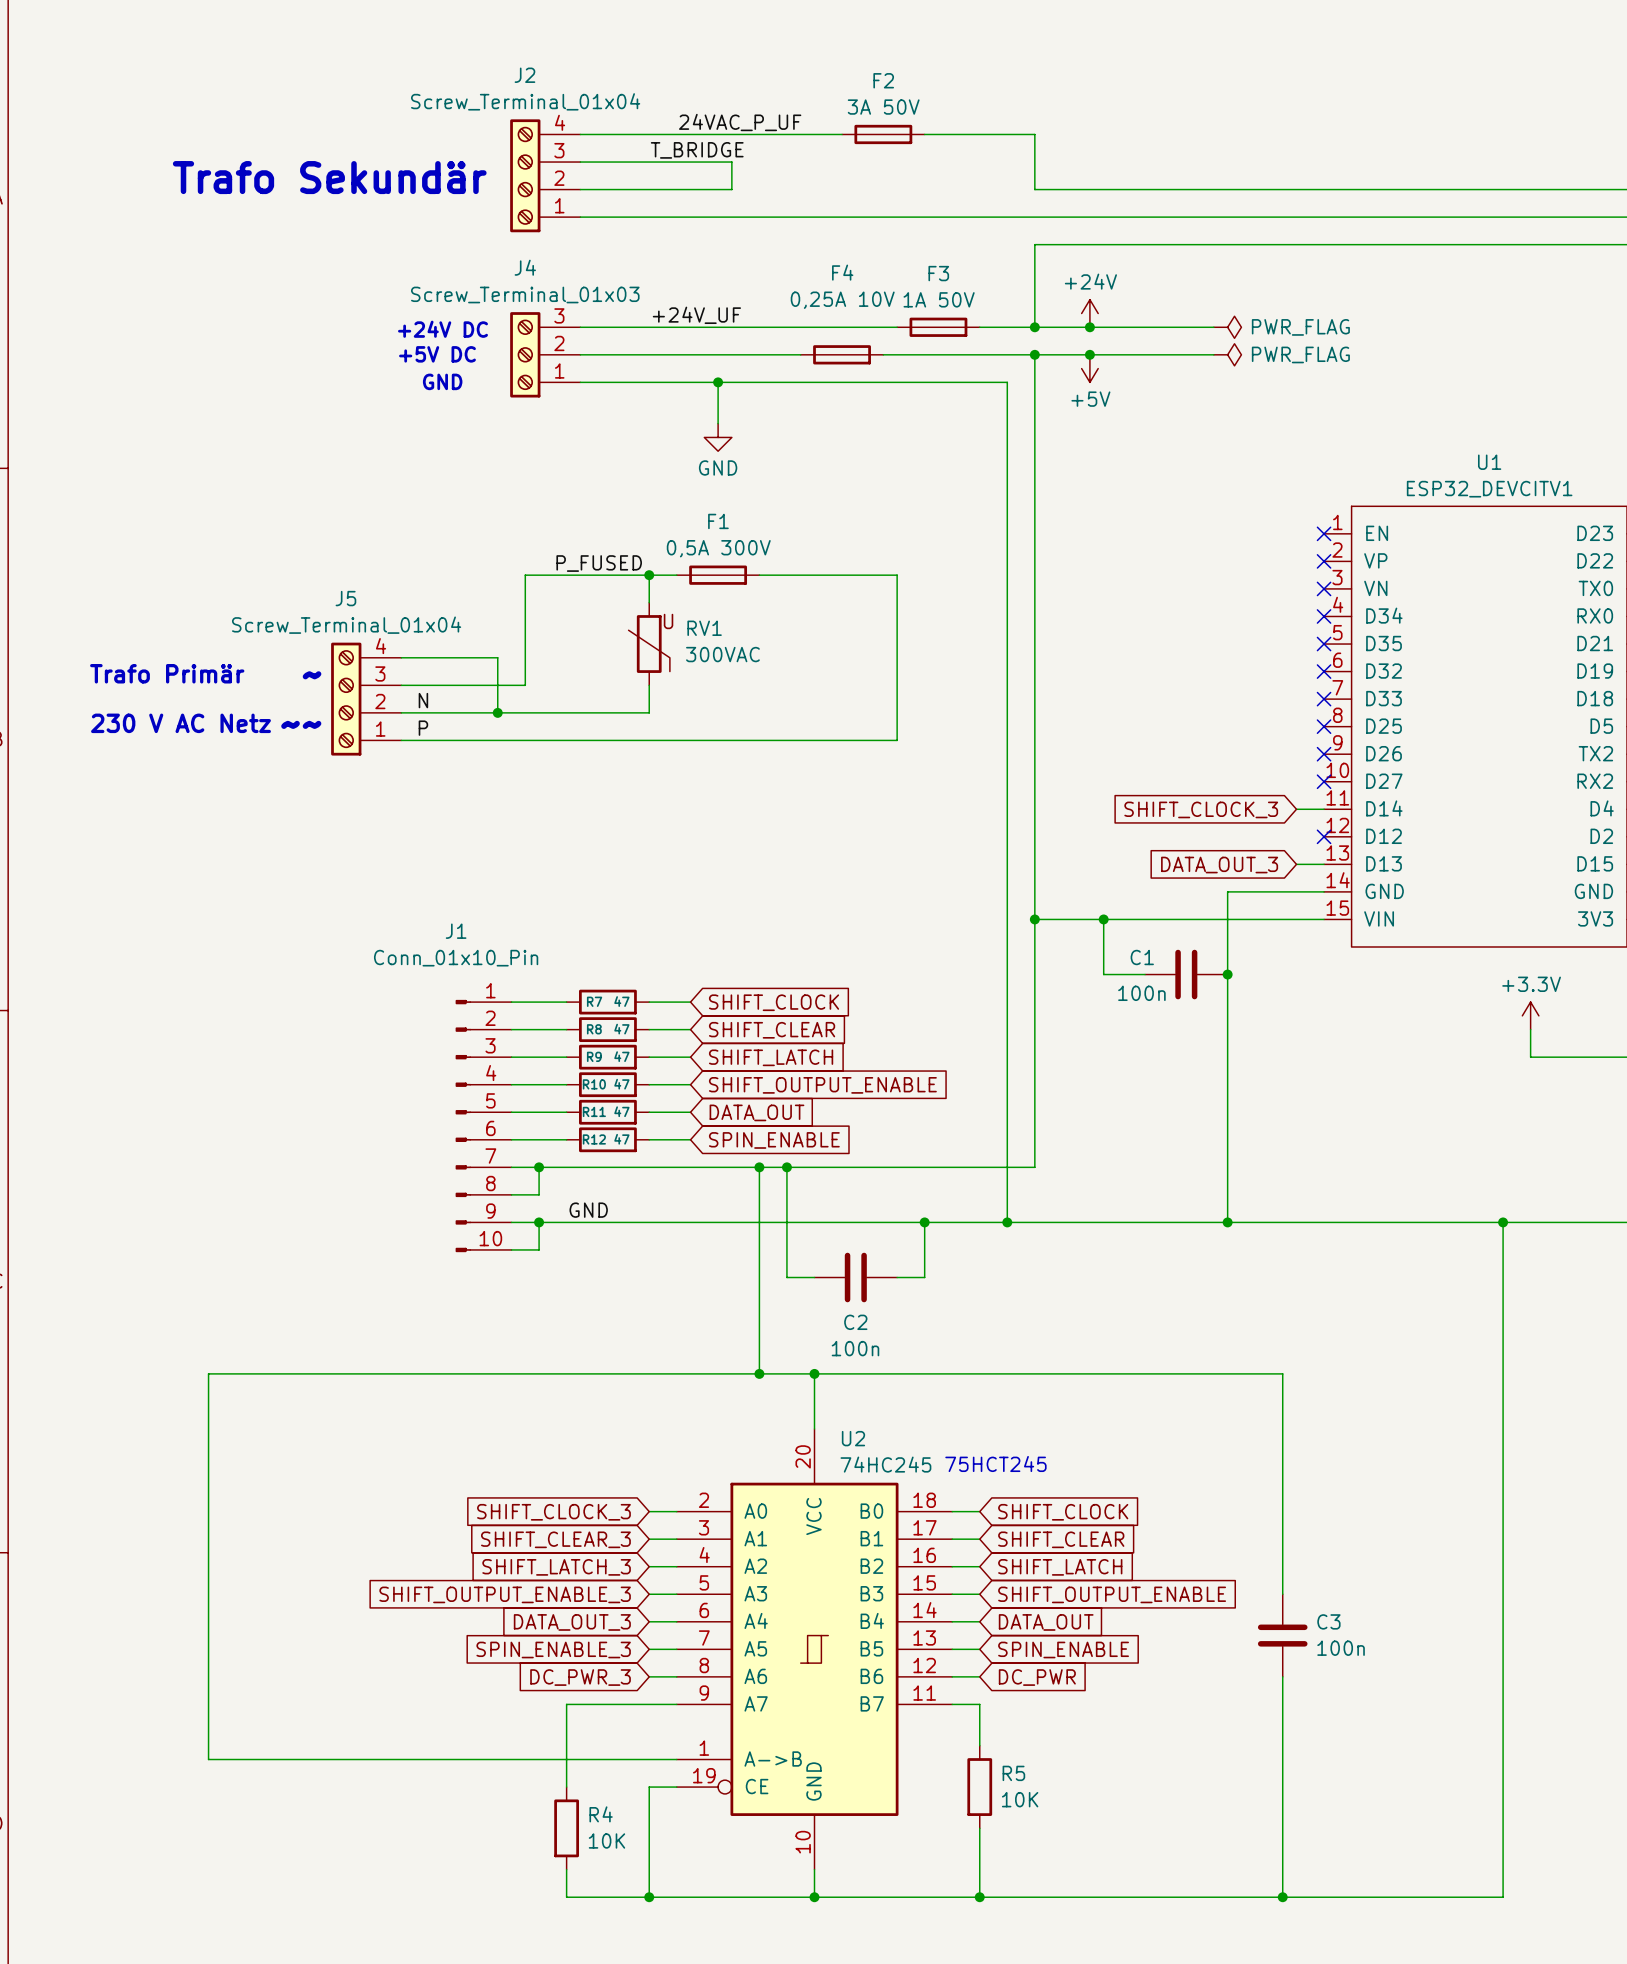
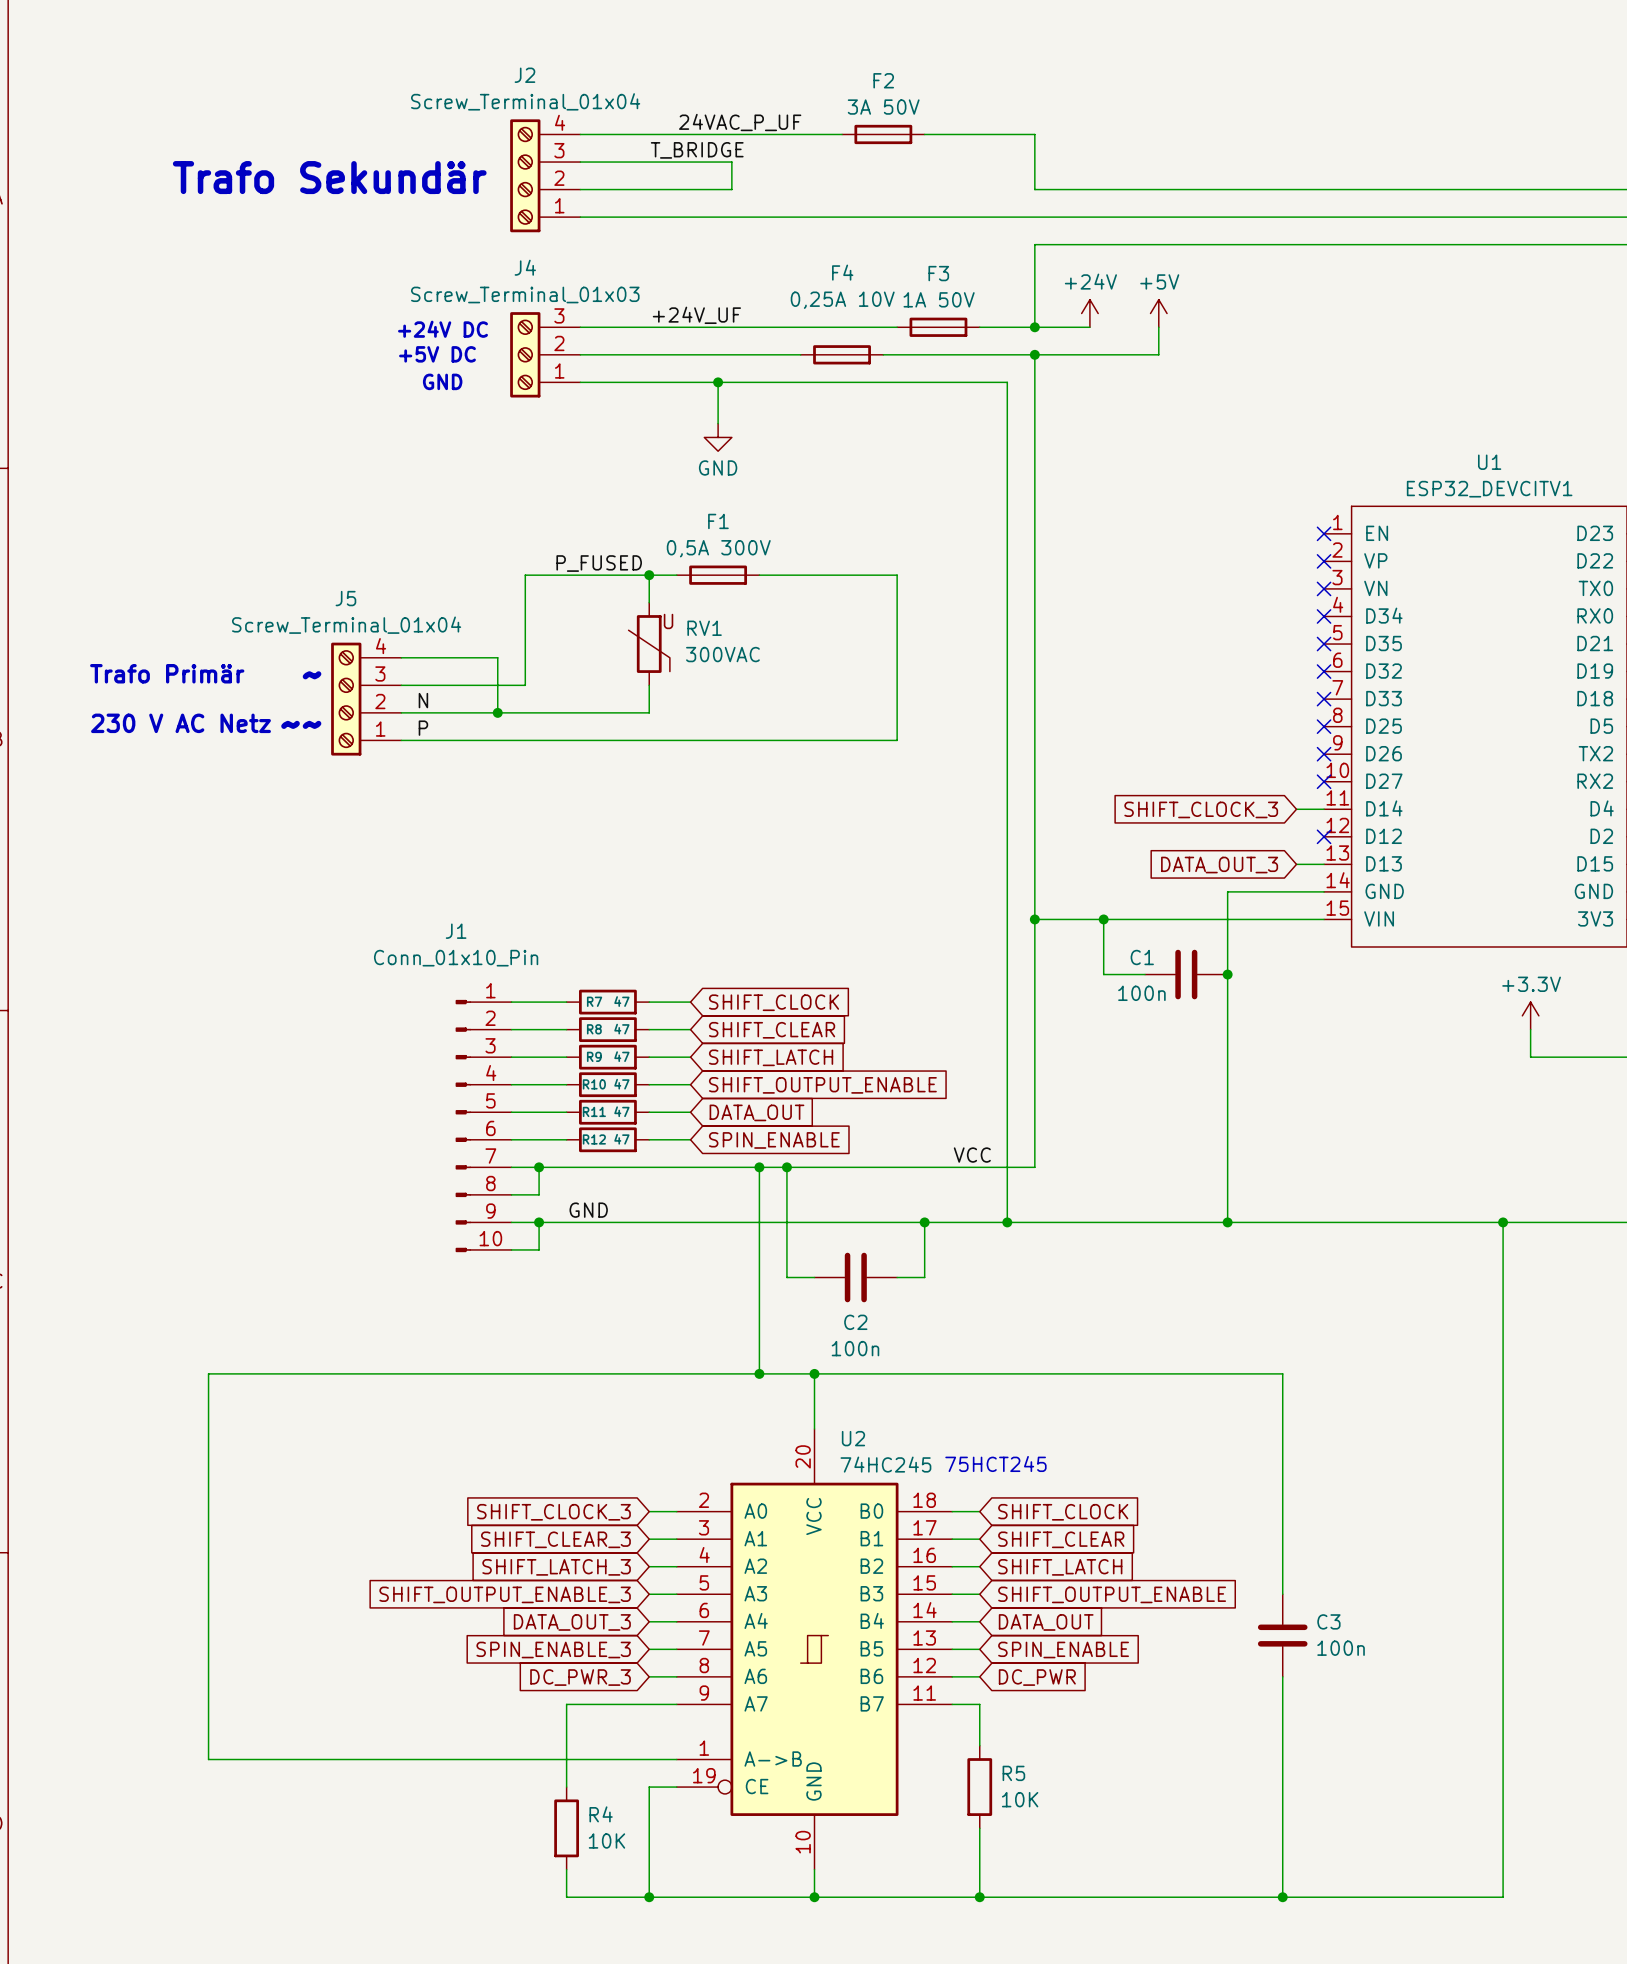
wire: (1089, 327) (1213, 327) -> none
junction: (1089, 327) -> none
power symbol: PWR_FLAG (1227, 327) -> none
junction: (1089, 354) -> none
wire: (1158, 354) (1213, 354) -> (1158, 354) (1158, 327)
power symbol: PWR_FLAG (1227, 354) -> none
power symbol rotation: 0° (1089, 368) -> 180° (1158, 313)
power symbol position: +5V (1089, 368) -> +5V (1158, 313)
label: none -> VCC (972, 1155)

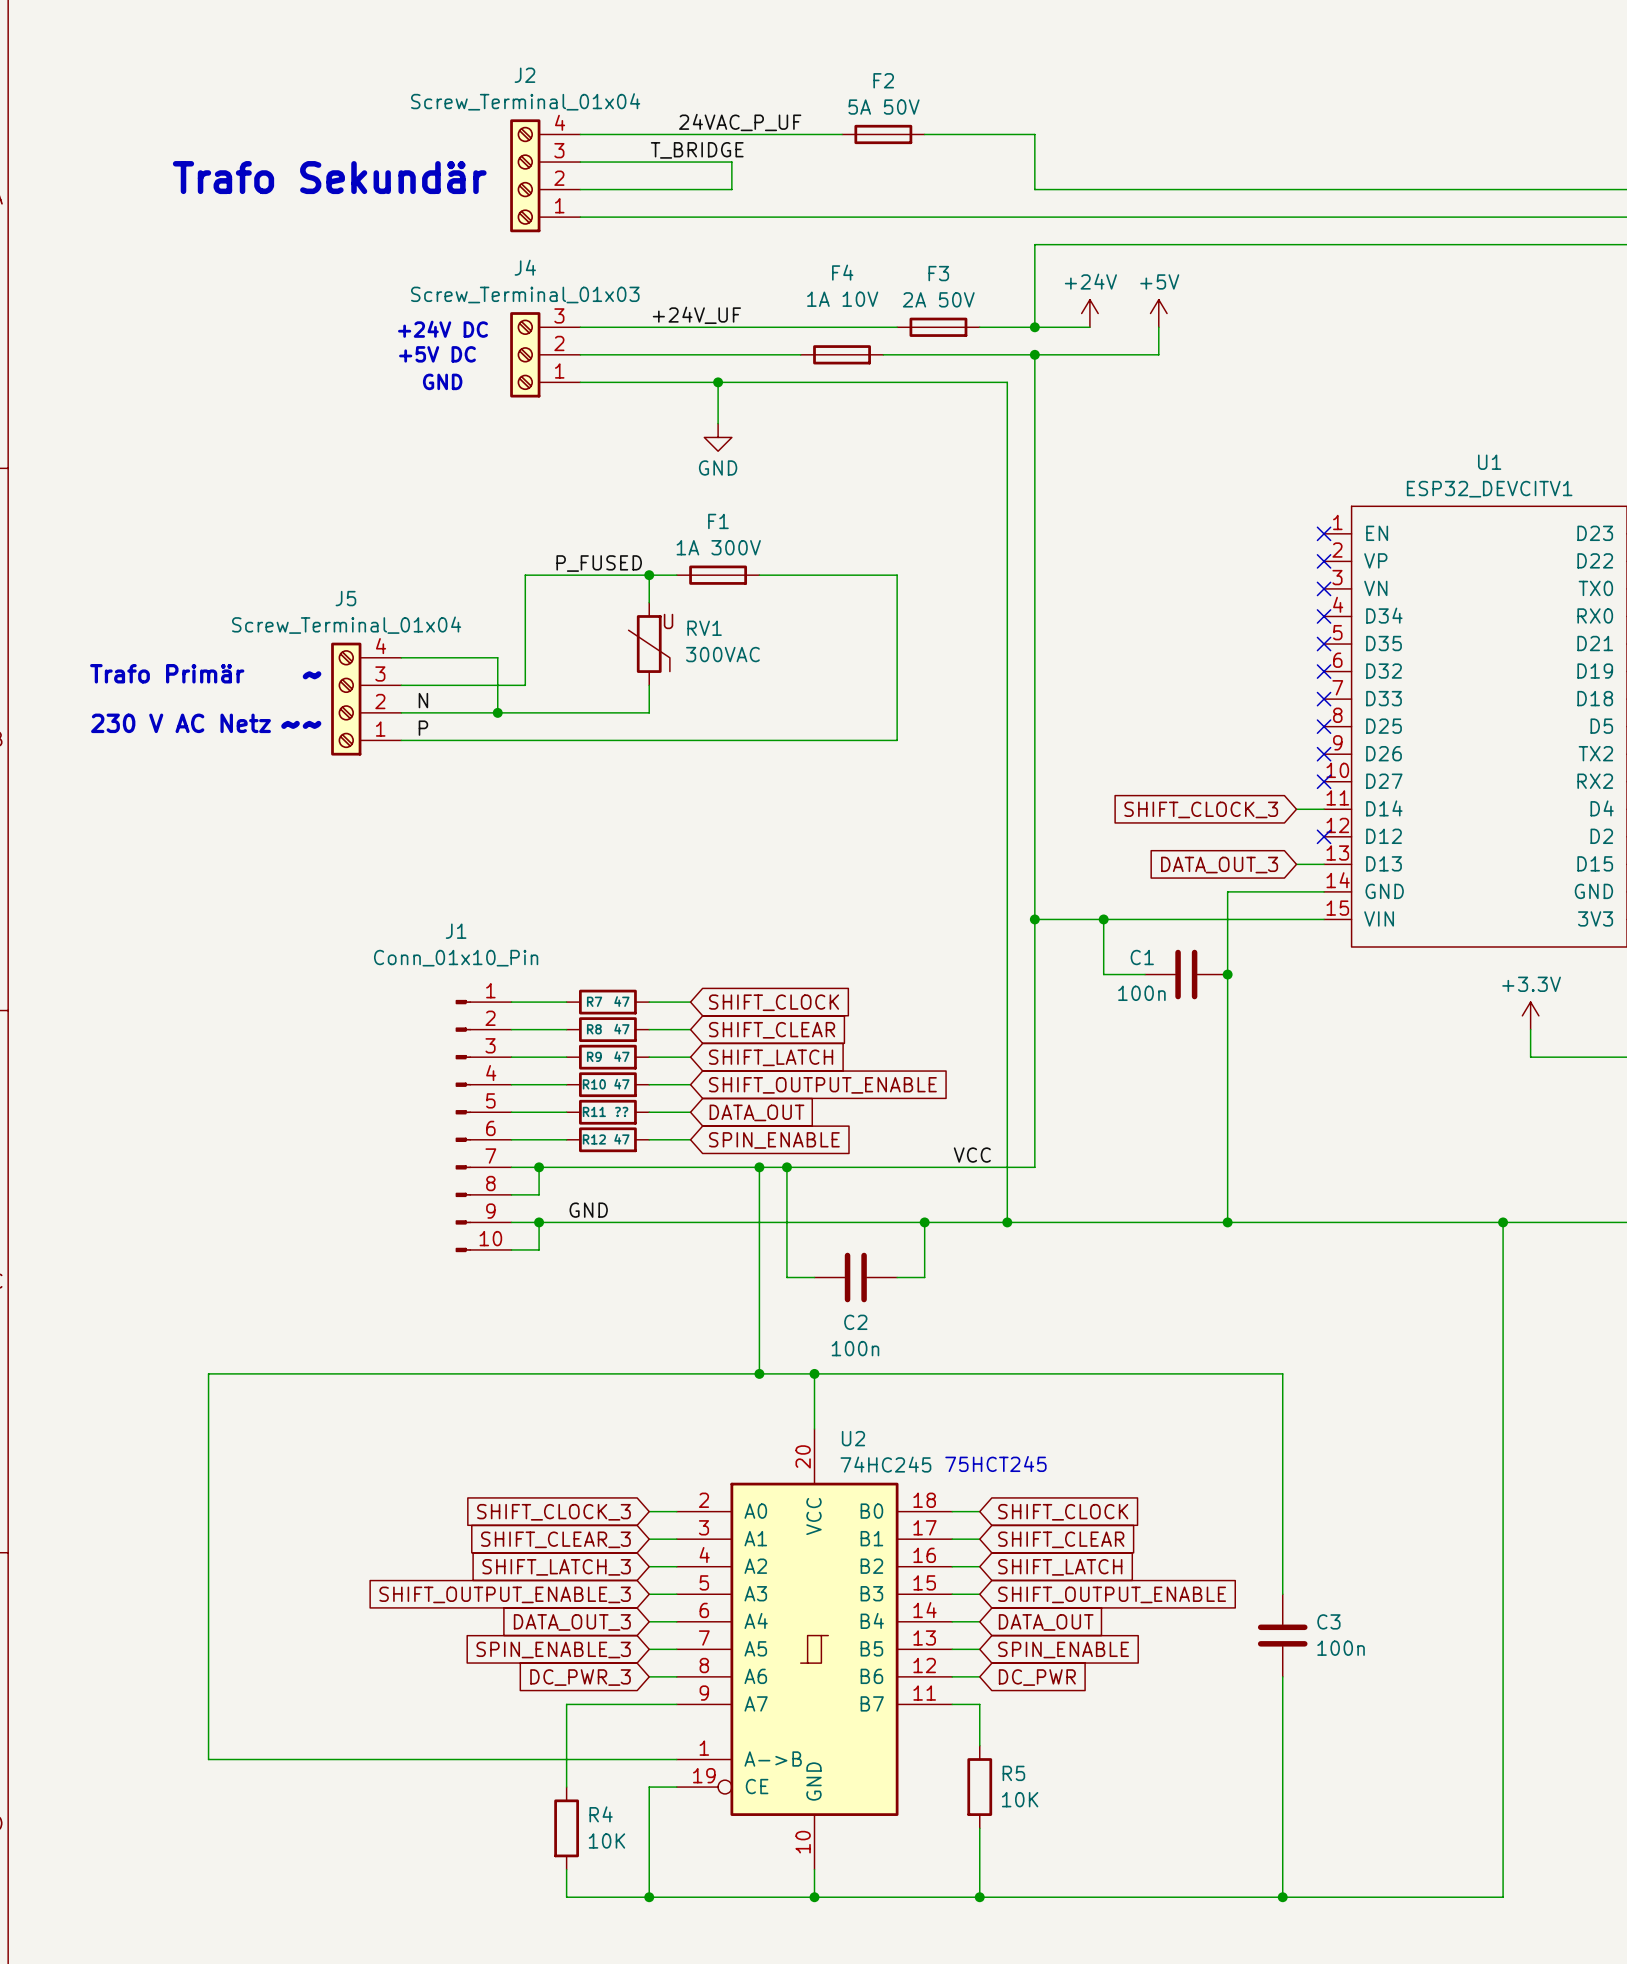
F2 value: 3A 50V (883, 107) -> 5A 50V (884, 107)
F3 value: 1A 50V (939, 299) -> 2A 50V (938, 299)
F4 value: 0,25A 10V (842, 300) -> 1A 10V (842, 299)
F1 value: 0,5A 300V (718, 548) -> 1A 300V (718, 547)
R11 value: 47 (621, 1111) -> ?? (621, 1111)

